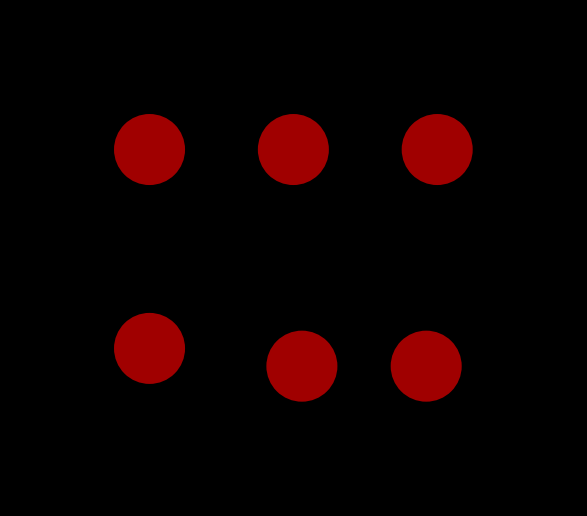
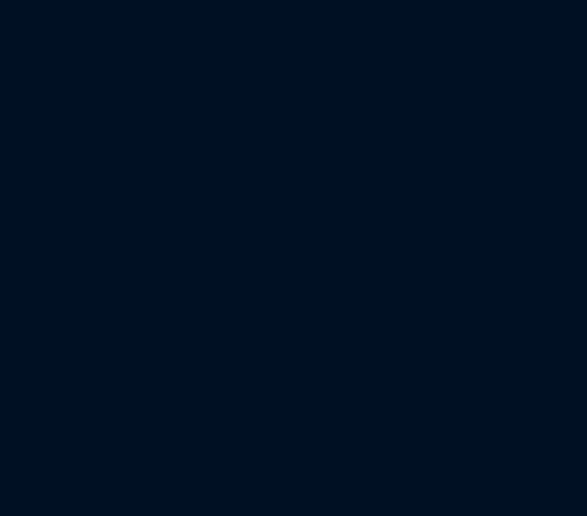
part: (149, 149) -> none
part: (293, 149) -> none
part: (437, 149) -> none
part: (149, 348) -> none
part: (301, 366) -> none
part: (426, 366) -> none

